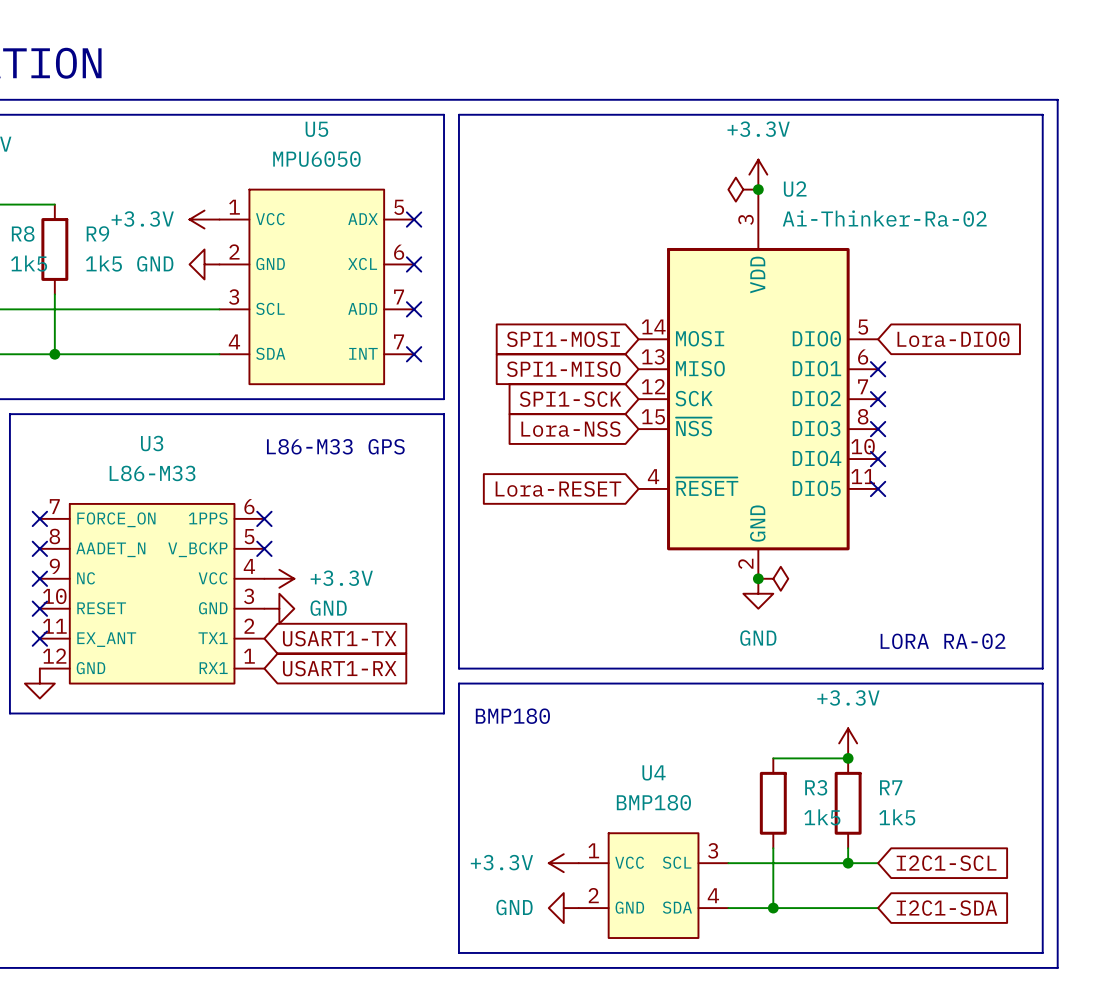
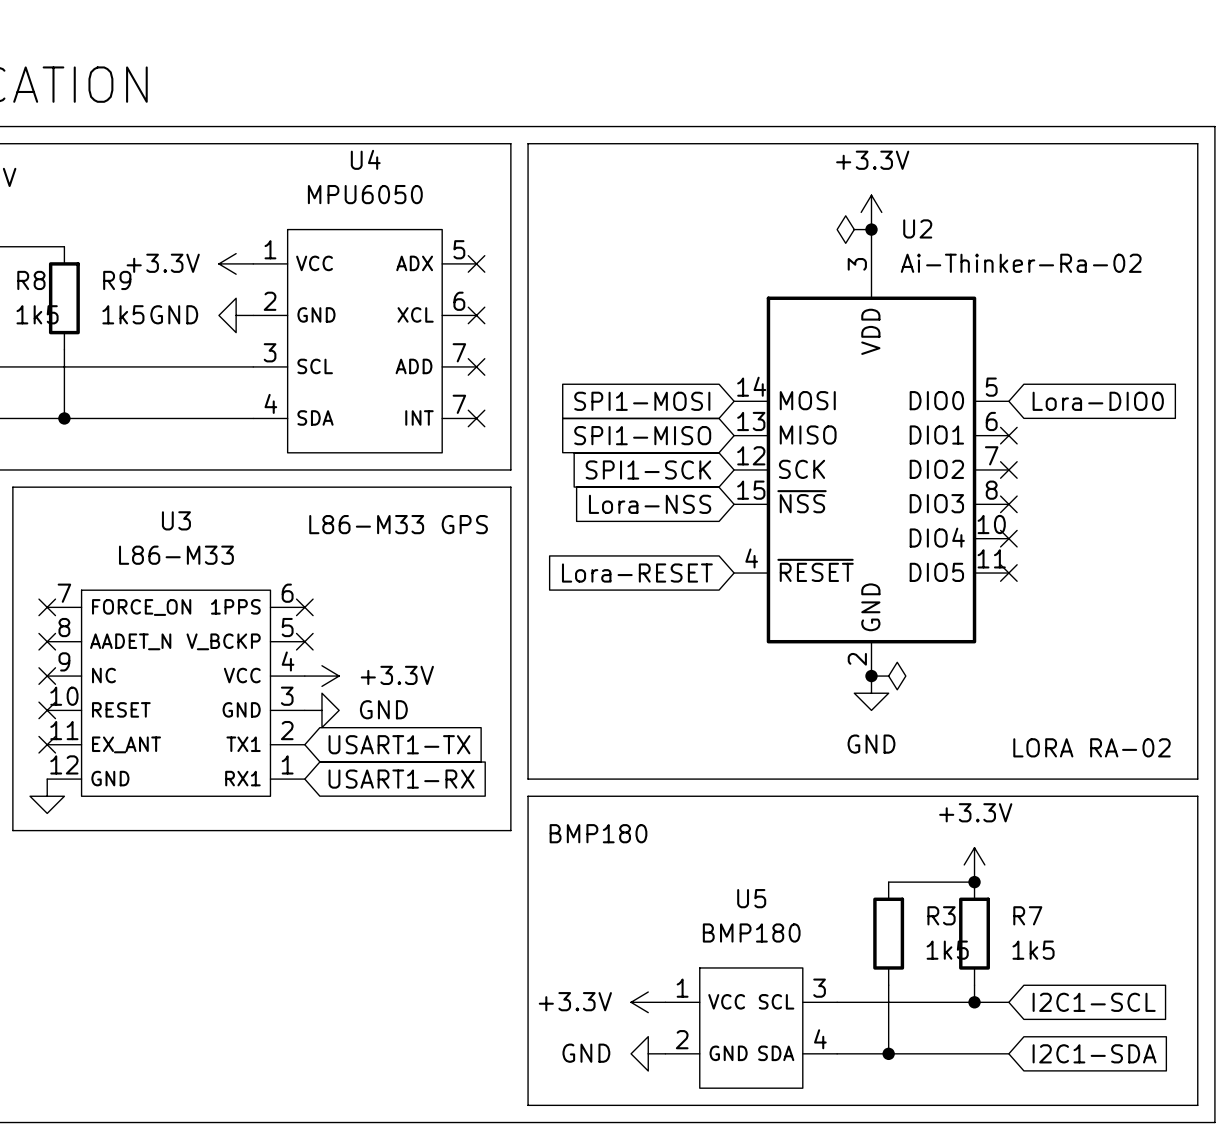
U5 name: U5 (316, 129) -> U4 (365, 159)
U4 name: U4 (654, 772) -> U5 (751, 898)

